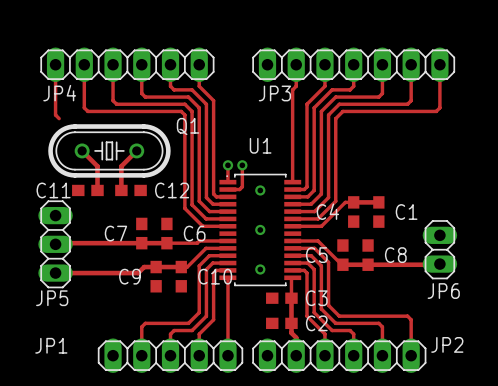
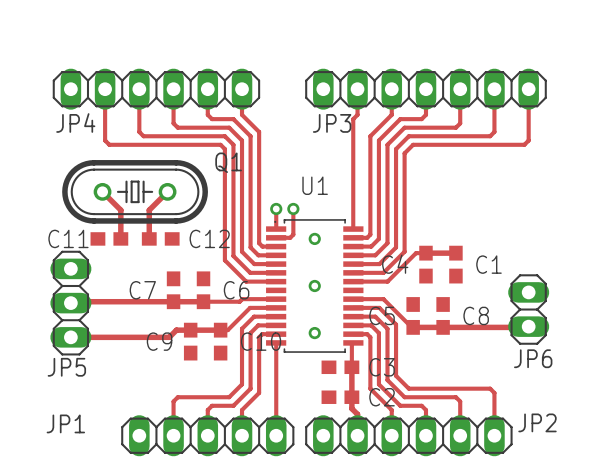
track: (55, 64) (55, 115) (59, 118) -> none

